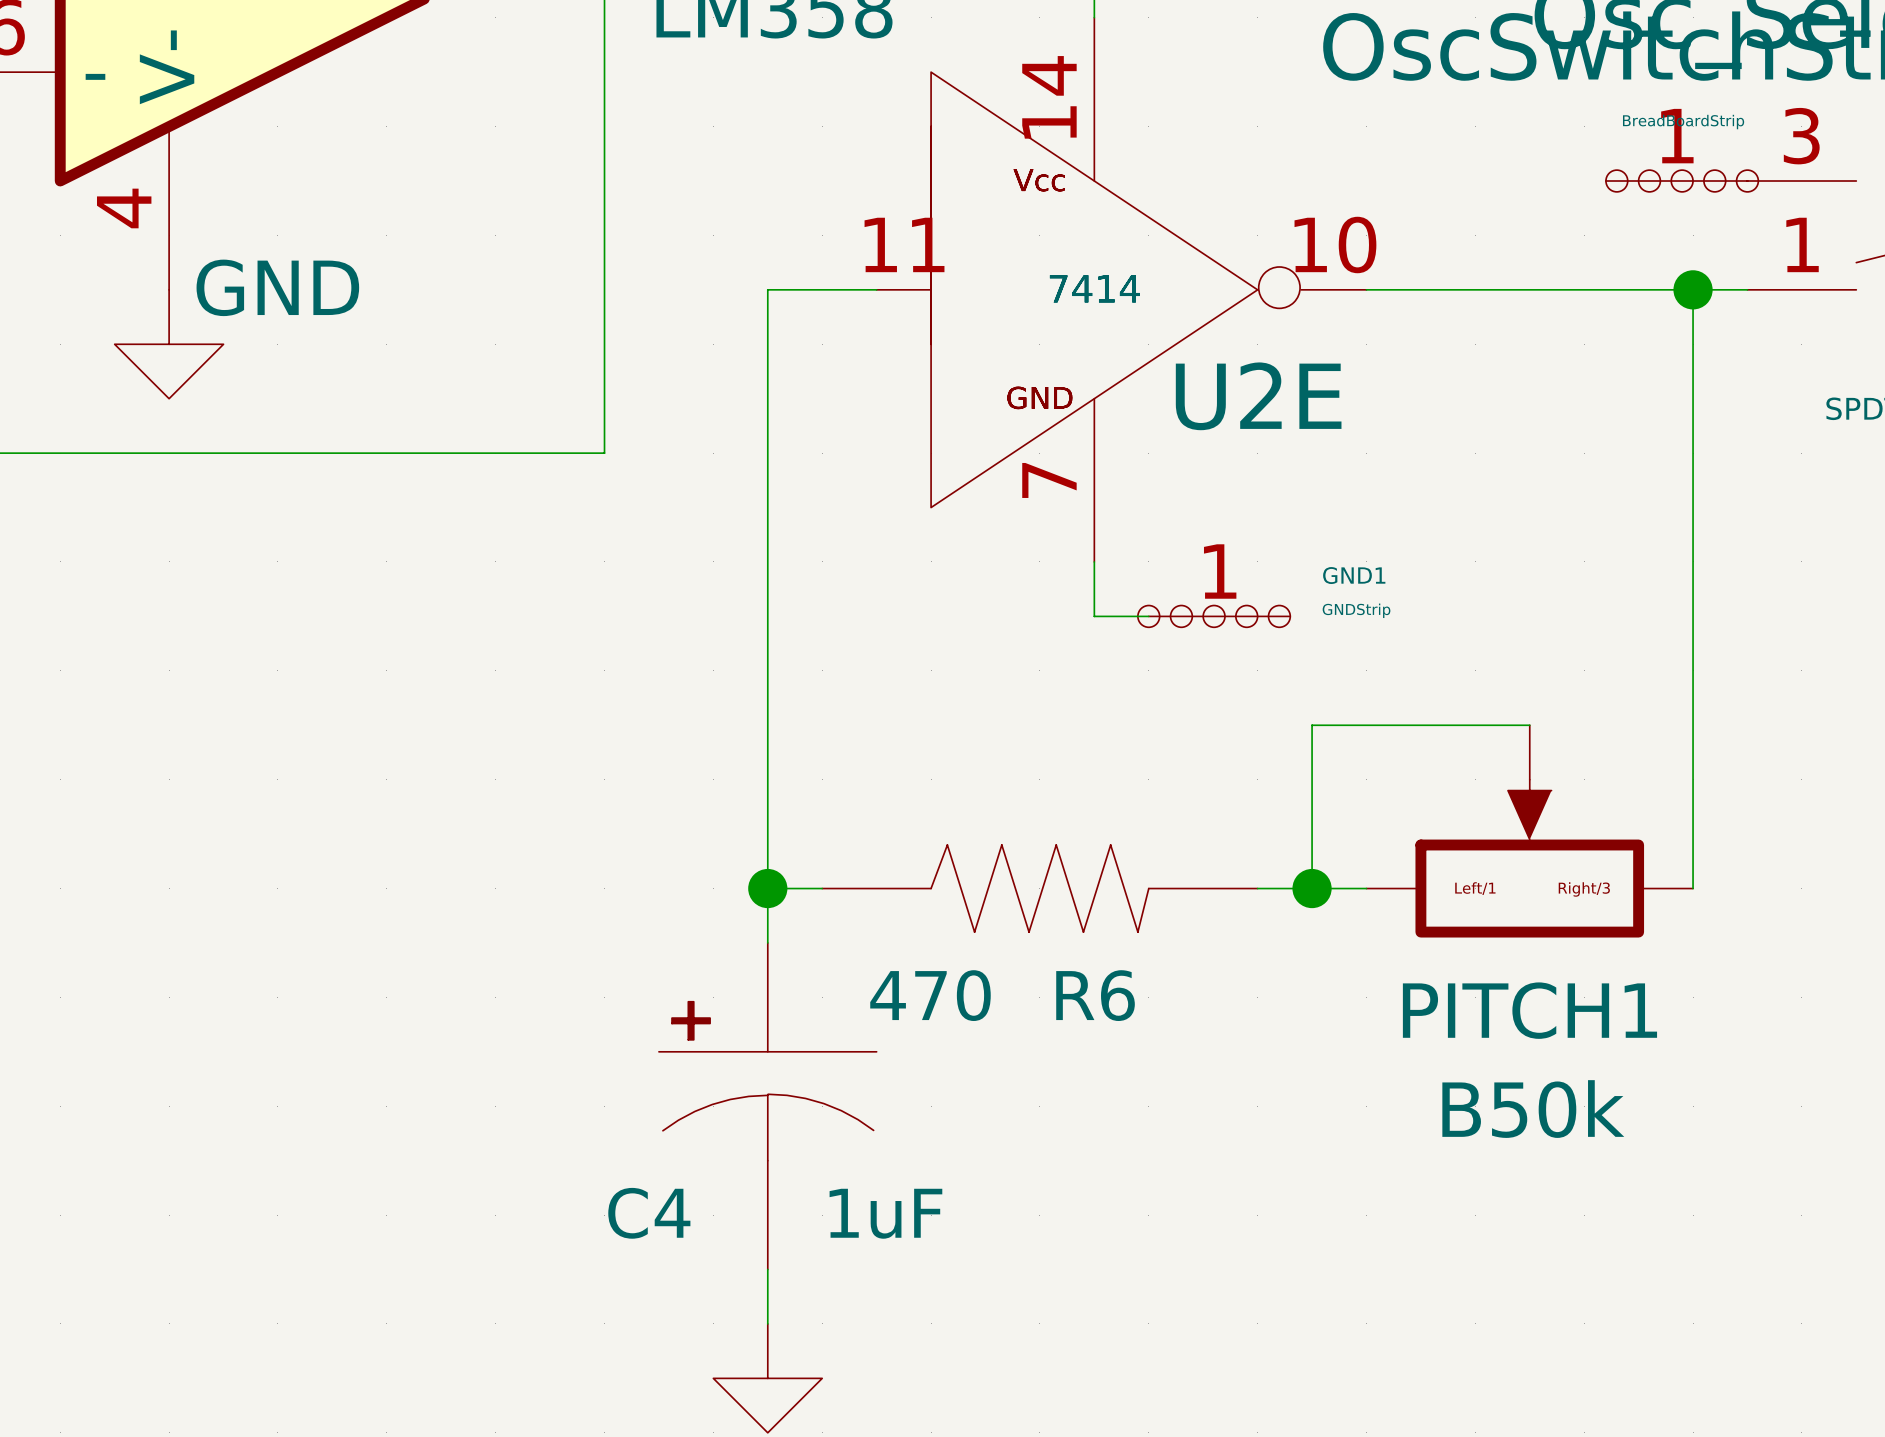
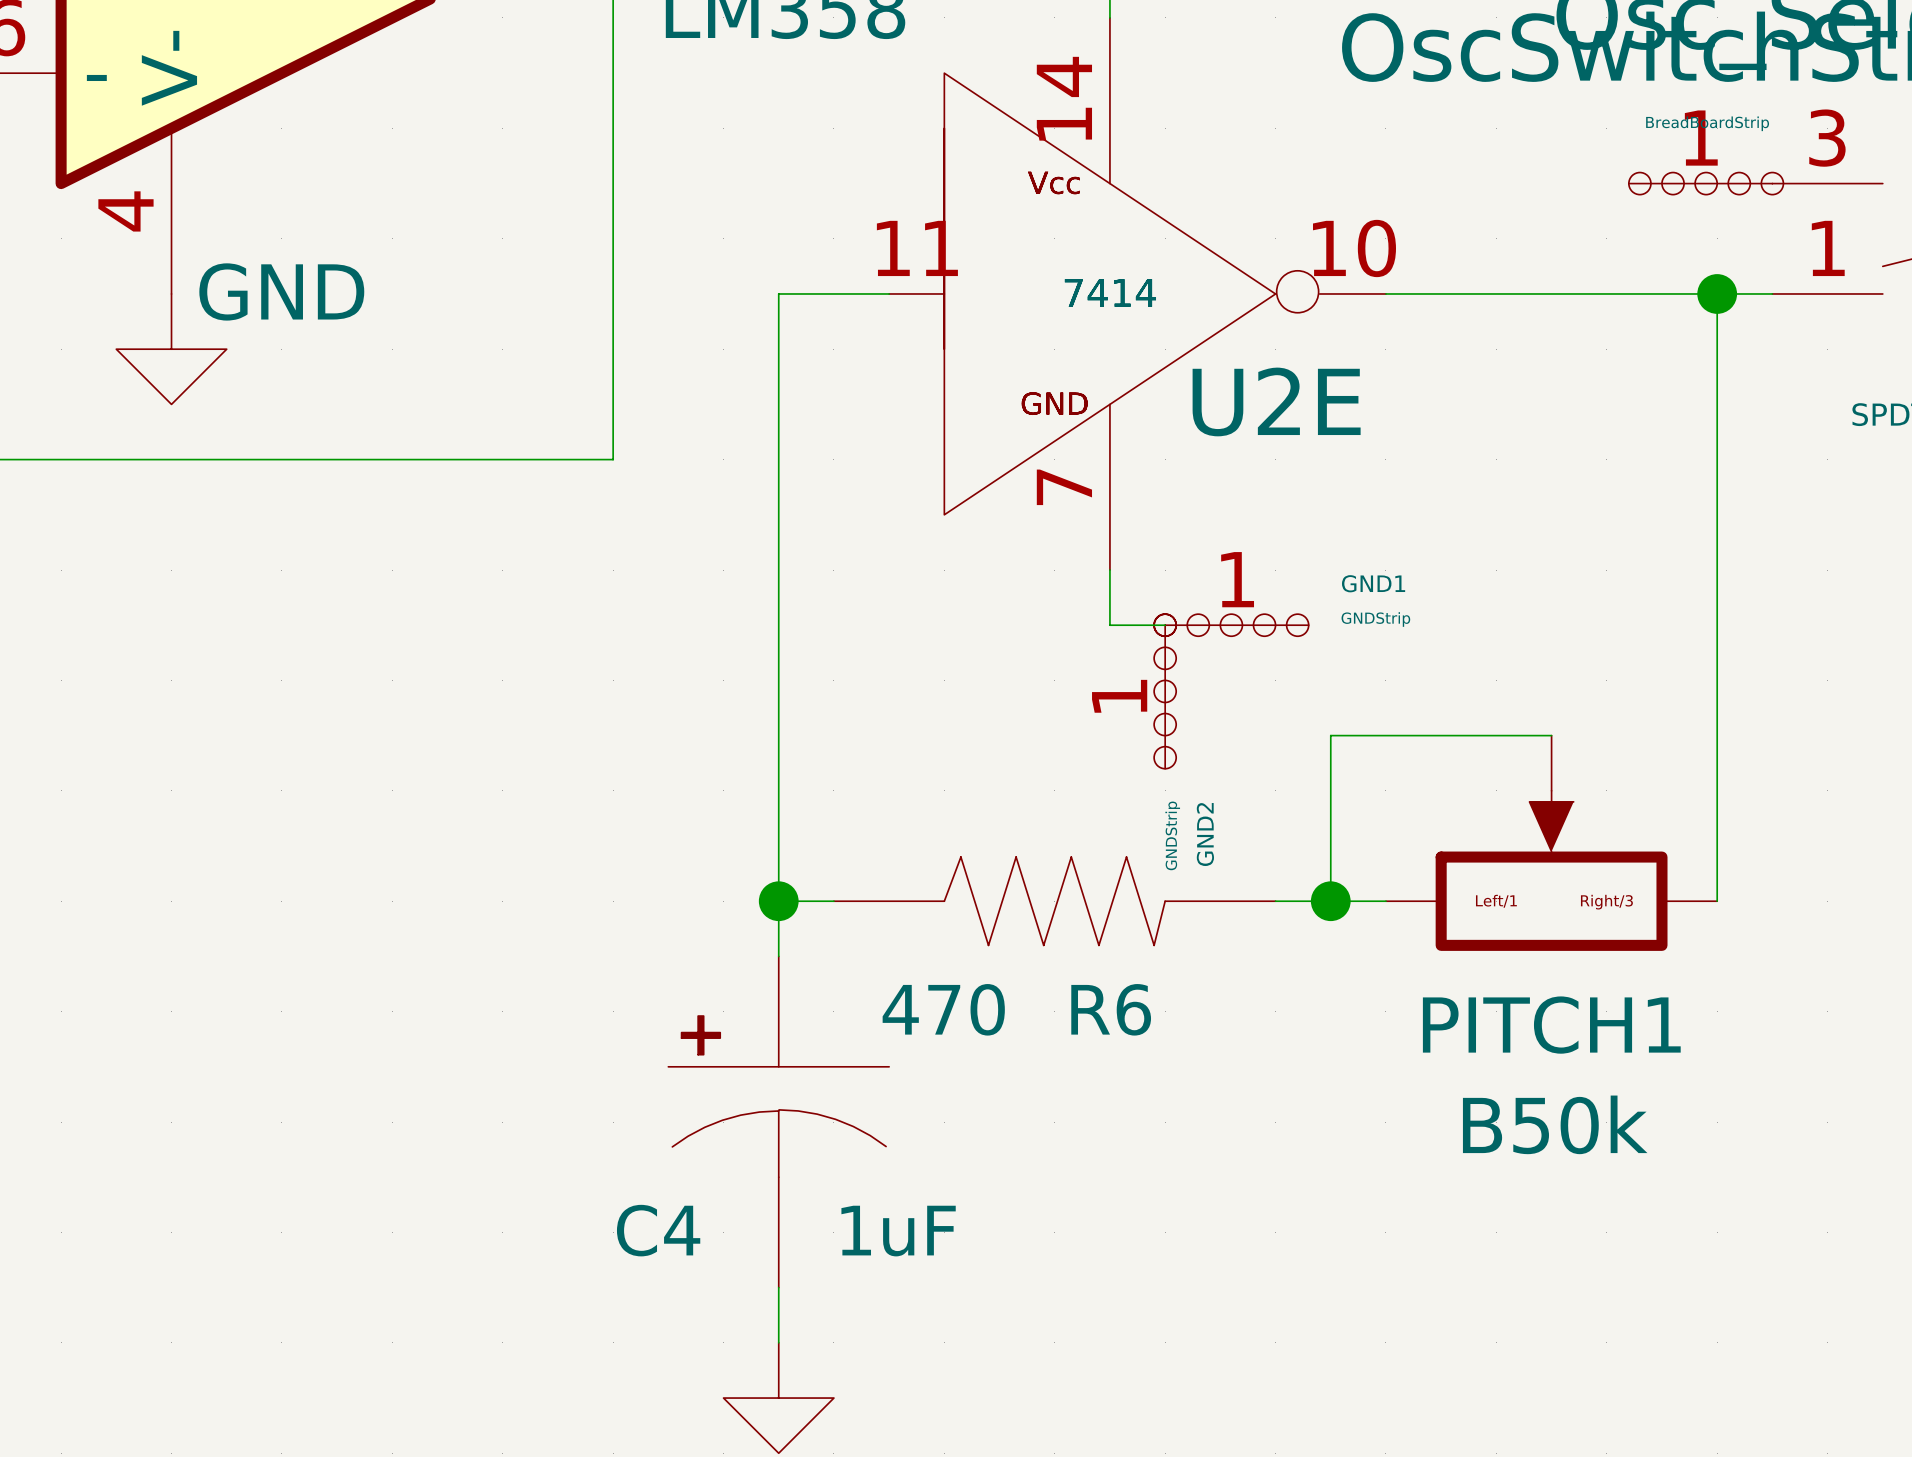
GND2: none -> GNDStrip (1165, 691)

